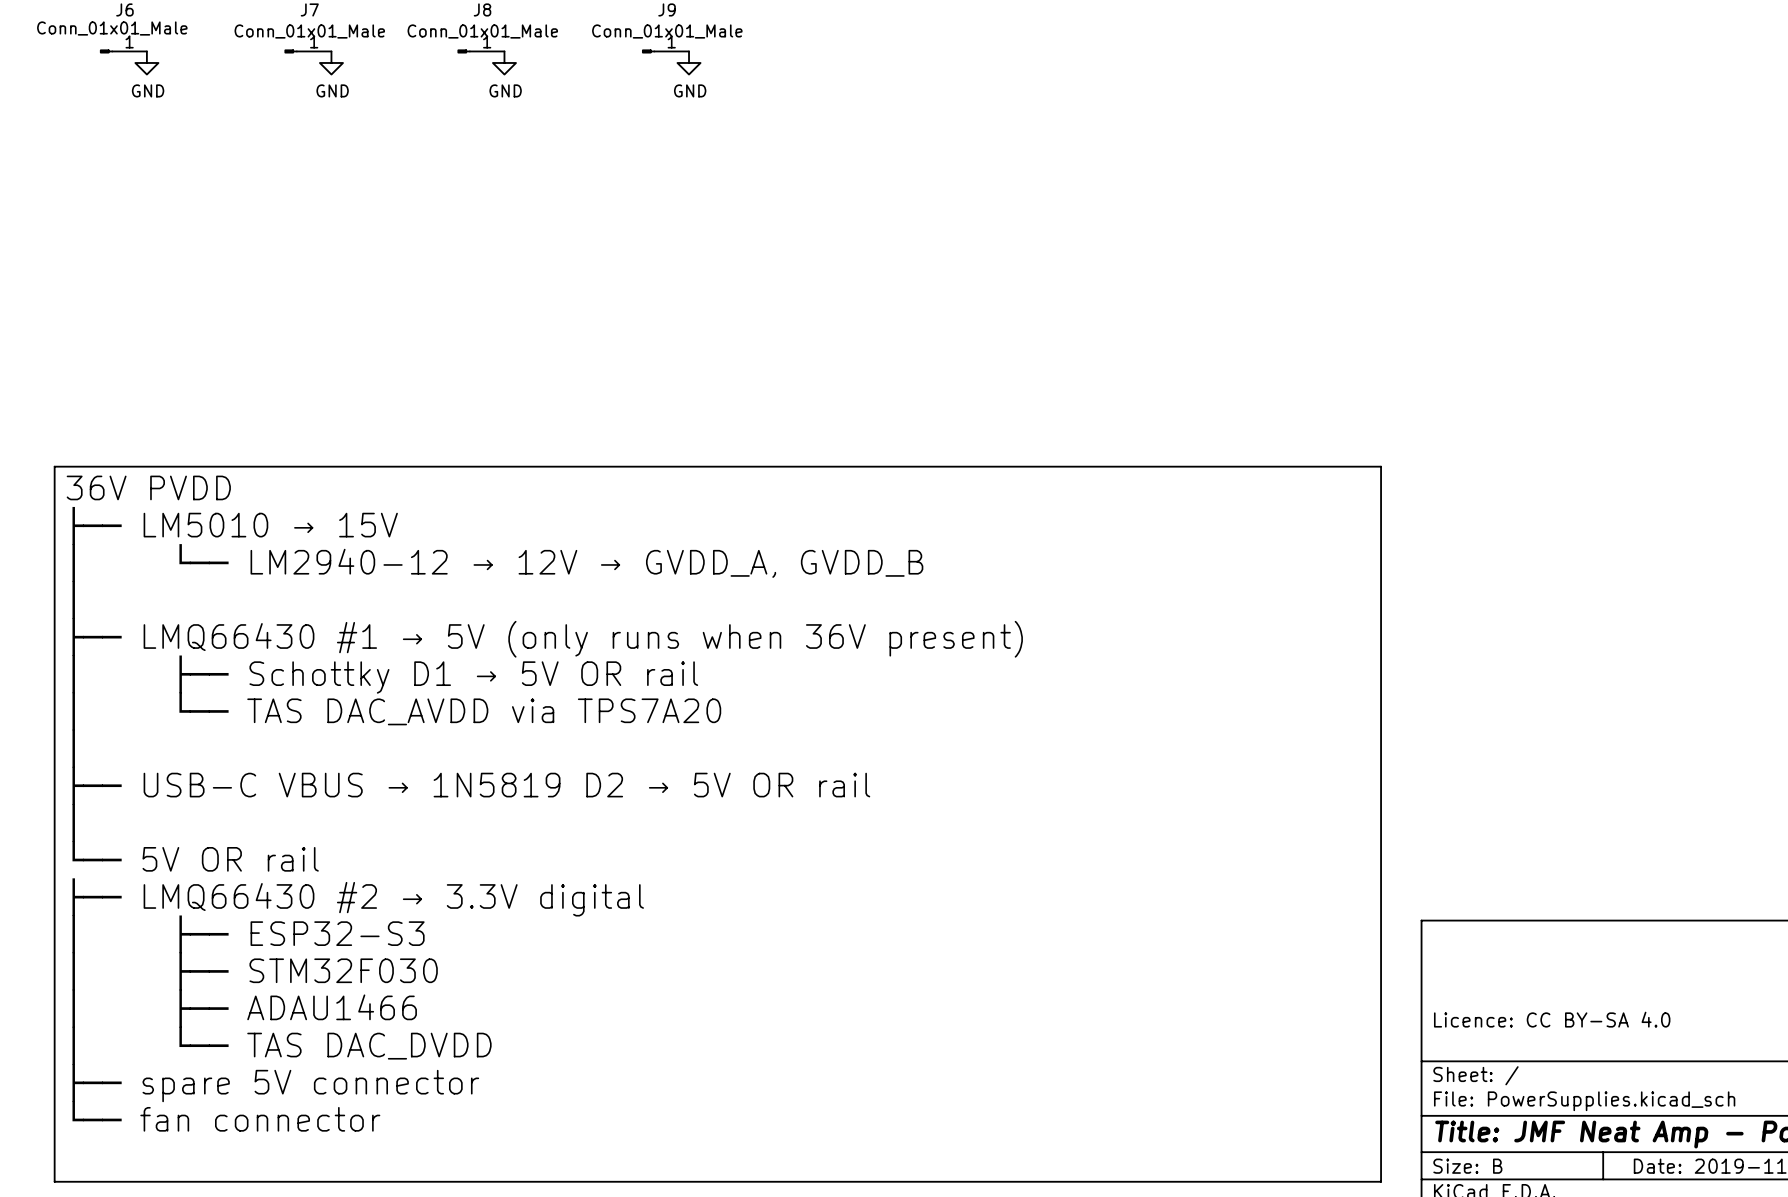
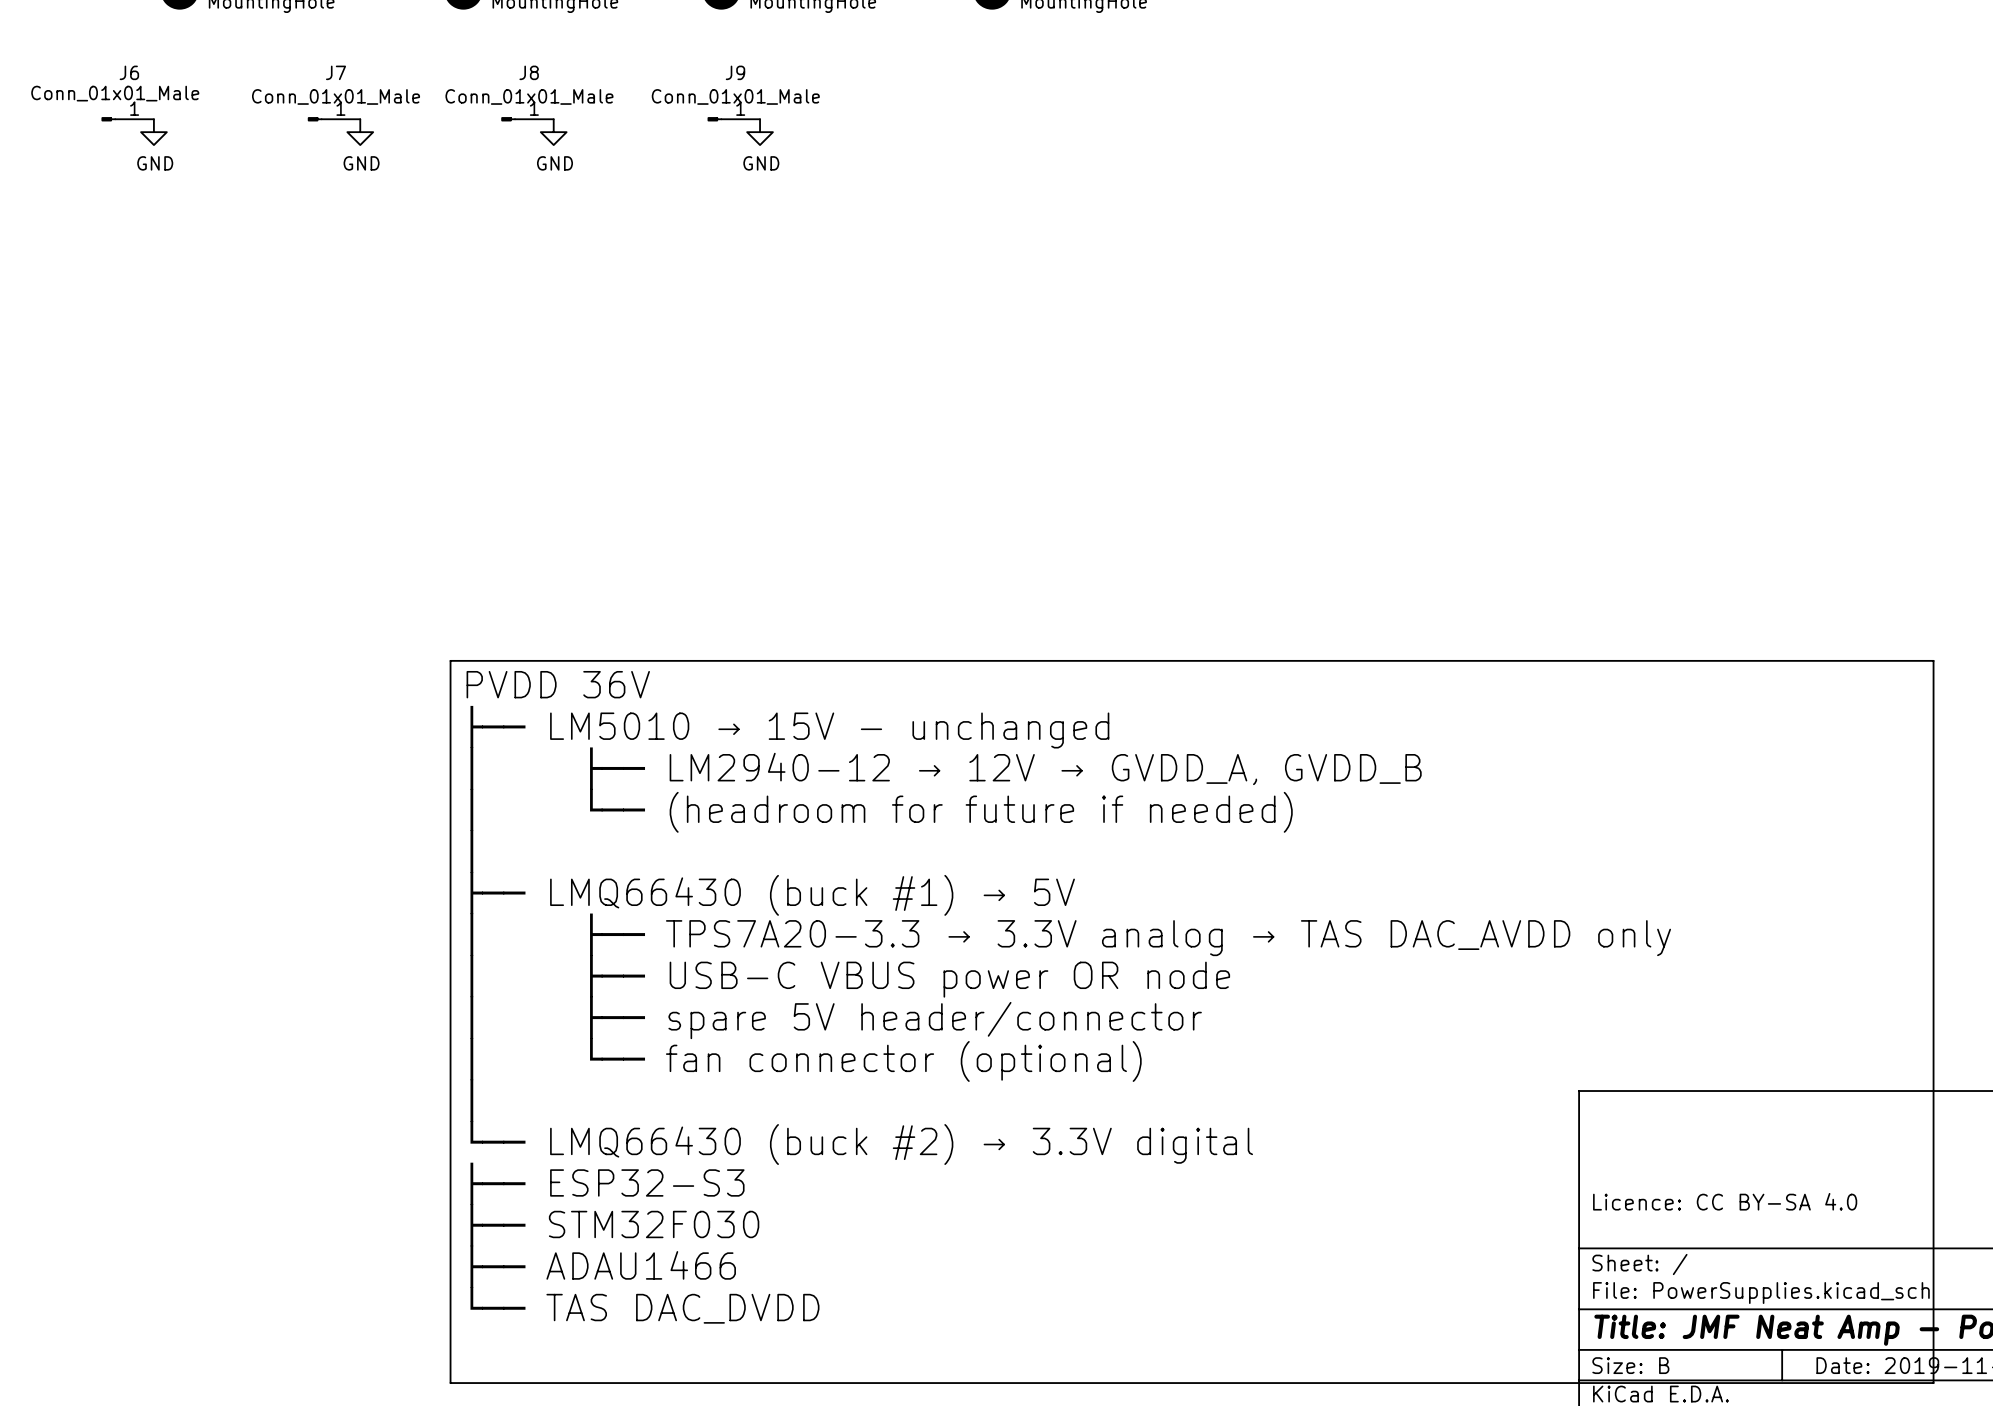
text: 36V PVDD (148, 487) -> none
text: ├── LM5010 → 15V (234, 525) -> none
text: none -> PVDD 36V (558, 684)
text: │ └── LM2940-12 → 12V → GVDD_A, GVDD_B (497, 562) -> none
text: none -> ├── LM5010 → 15V - unchanged (789, 726)
text: │ (73, 600) -> none
text: none -> │ ├── LM2940-12 → 12V → GVDD_A, GVDD_B (945, 768)
text: ├── LMQ66430 #1 → 5V (only runs when 36V present) (547, 637) -> none
text: none -> │ └── (headroom for future if needed) (881, 810)
text: │ ├── Schottky D1 → 5V OR rail (384, 674) -> none
text: none -> │ (471, 851)
text: │ └── TAS DAC_AVDD via TPS7A20 (396, 711) -> none
text: none -> ├── LMQ66430 (buck #1) → 5V (772, 893)
text: │ (73, 748) -> none
text: none -> │ ├── TPS7A20-3.3 → 3.3V analog → TAS DAC_AVDD only (1070, 934)
text: ├── USB-C VBUS → 1N5819 D2 → 5V OR rail (470, 785) -> none
text: none -> │ ├── USB-C VBUS power OR node (849, 976)
text: │ (73, 822) -> none
text: none -> │ ├── spare 5V header/connector (835, 1017)
text: └── 5V OR rail (195, 856) -> none
text: none -> │ └── fan connector (optional) (805, 1059)
text: ├── LMQ66430 #2 → 3.3V digital (357, 897) -> none
text: none -> │ (471, 1100)
text: │ ├── ESP32-S3 (248, 934) -> none
text: none -> └── LMQ66430 (buck #2) → 3.3V digital (861, 1142)
text: │ ├── STM32F030 (254, 971) -> none
text: none -> ├── ESP32-S3 (607, 1183)
text: │ ├── ADAU1466 (244, 1008) -> none
text: none -> ├── STM32F030 (614, 1225)
text: │ └── TAS DAC_DVDD (281, 1045) -> none
text: none -> ├── ADAU1466 (602, 1266)
text: ├── spare 5V connector (275, 1082) -> none
text: none -> └── TAS DAC_DVDD (644, 1305)
text: └── fan connector (225, 1116) -> none
line: (412, 1181) (54, 1181) (54, 466) (1381, 466) (1381, 1181) -> (450, 1383) (450, 660) (1933, 660) (1933, 1383) (1533, 1383)

